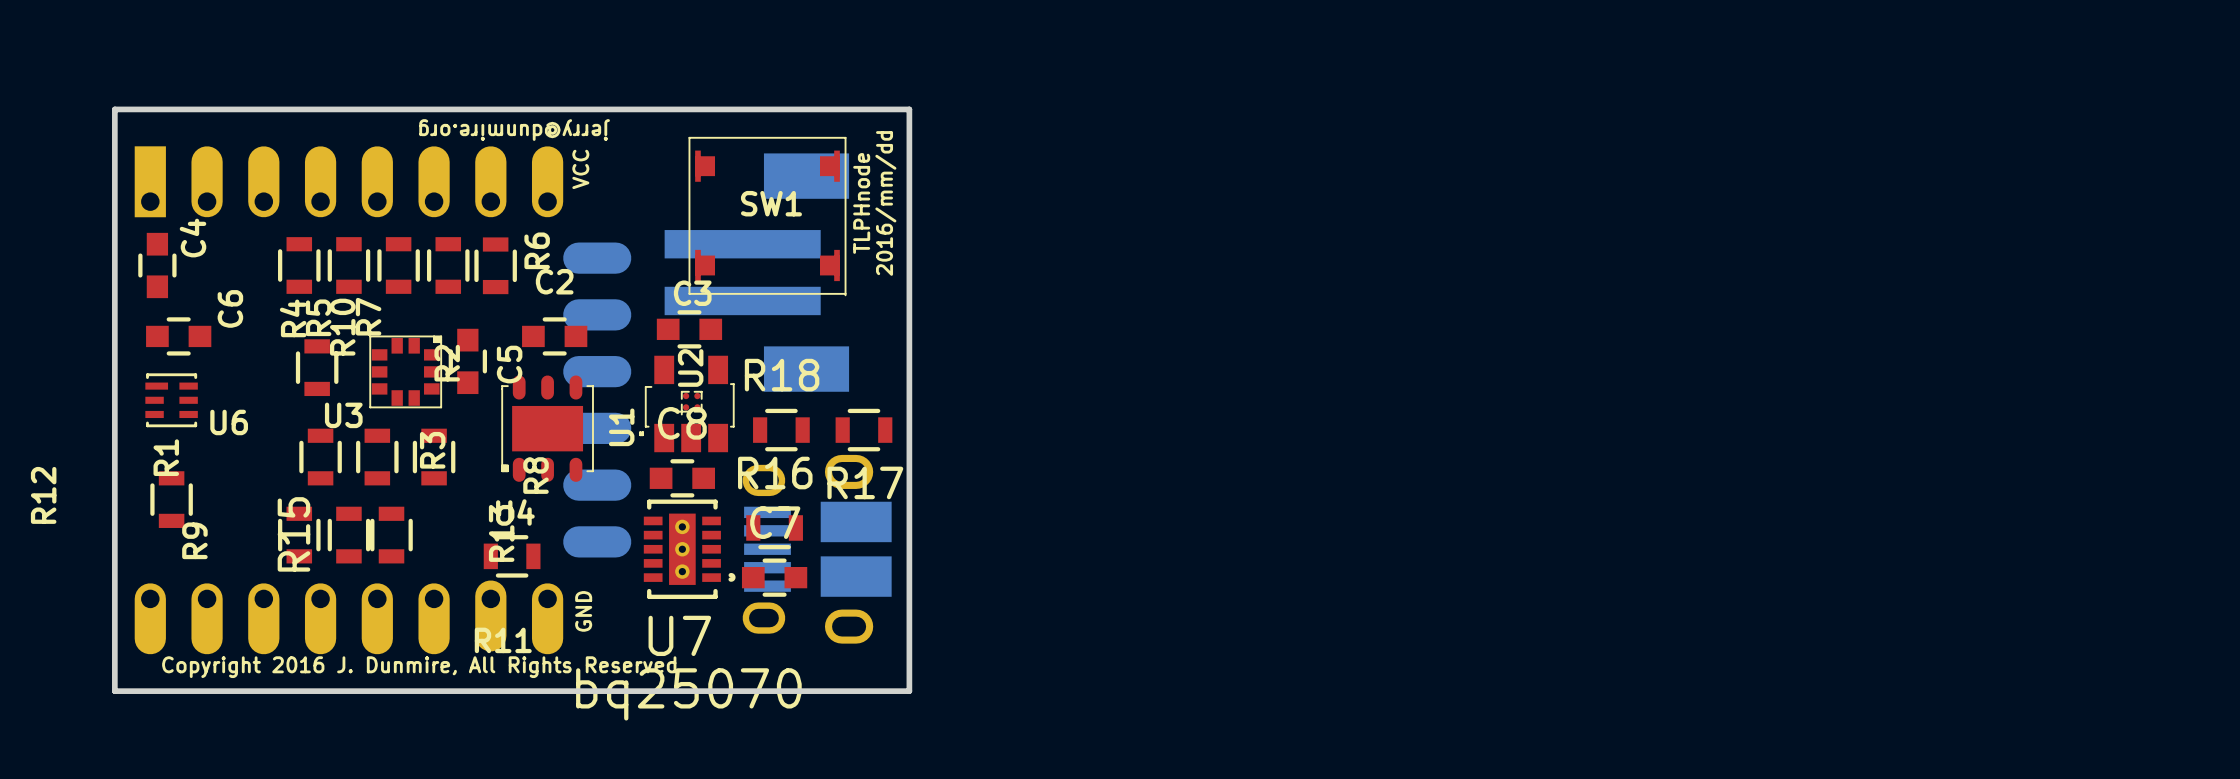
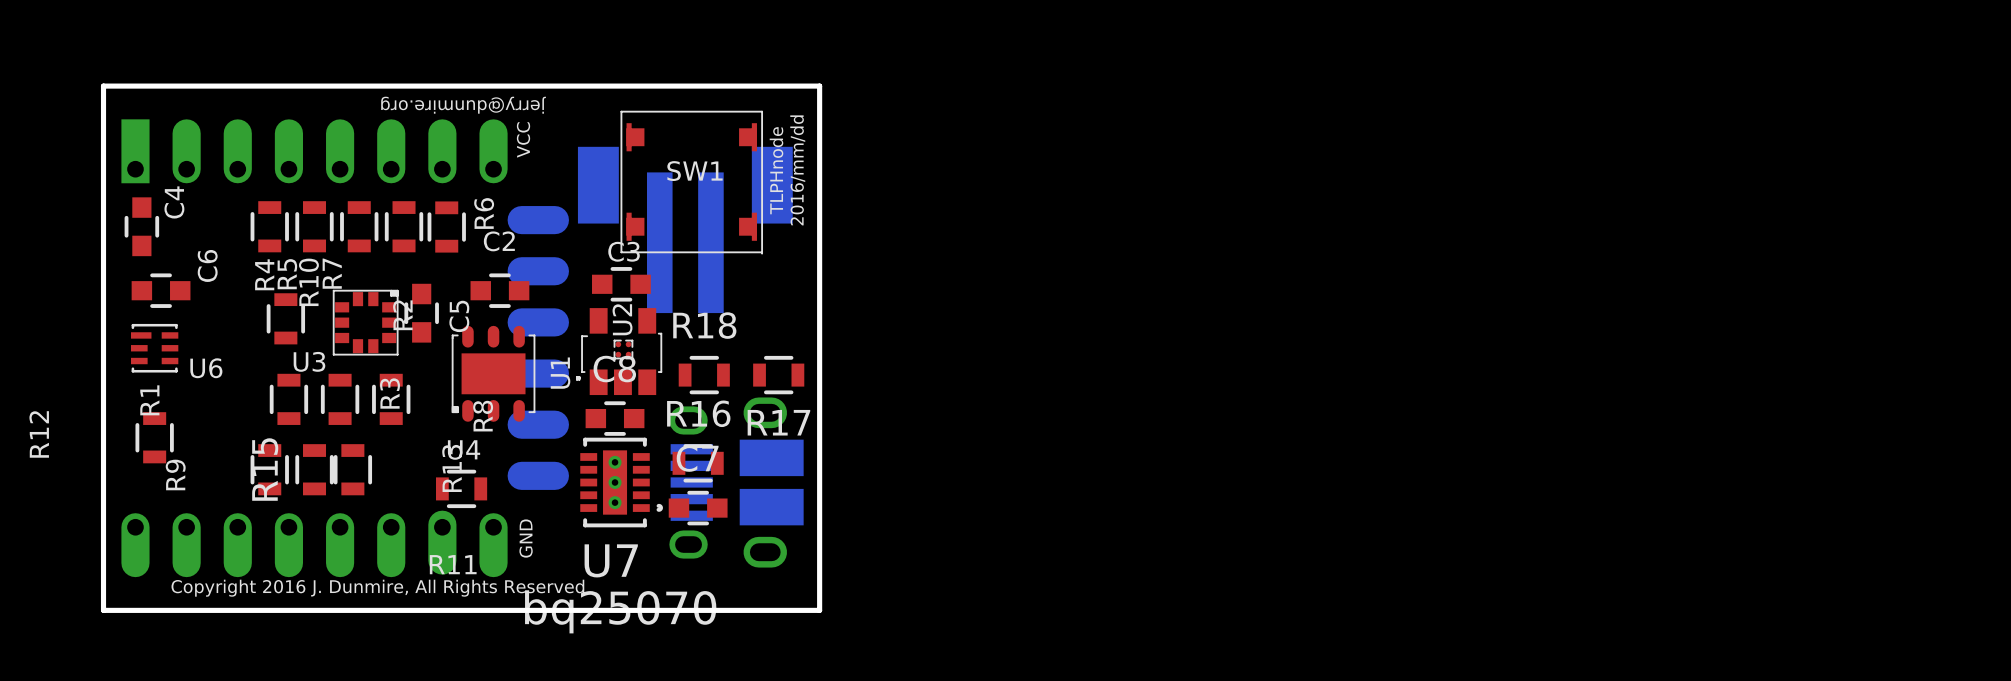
part rotation: 0° (756, 272) -> 90° counterclockwise (685, 229)

